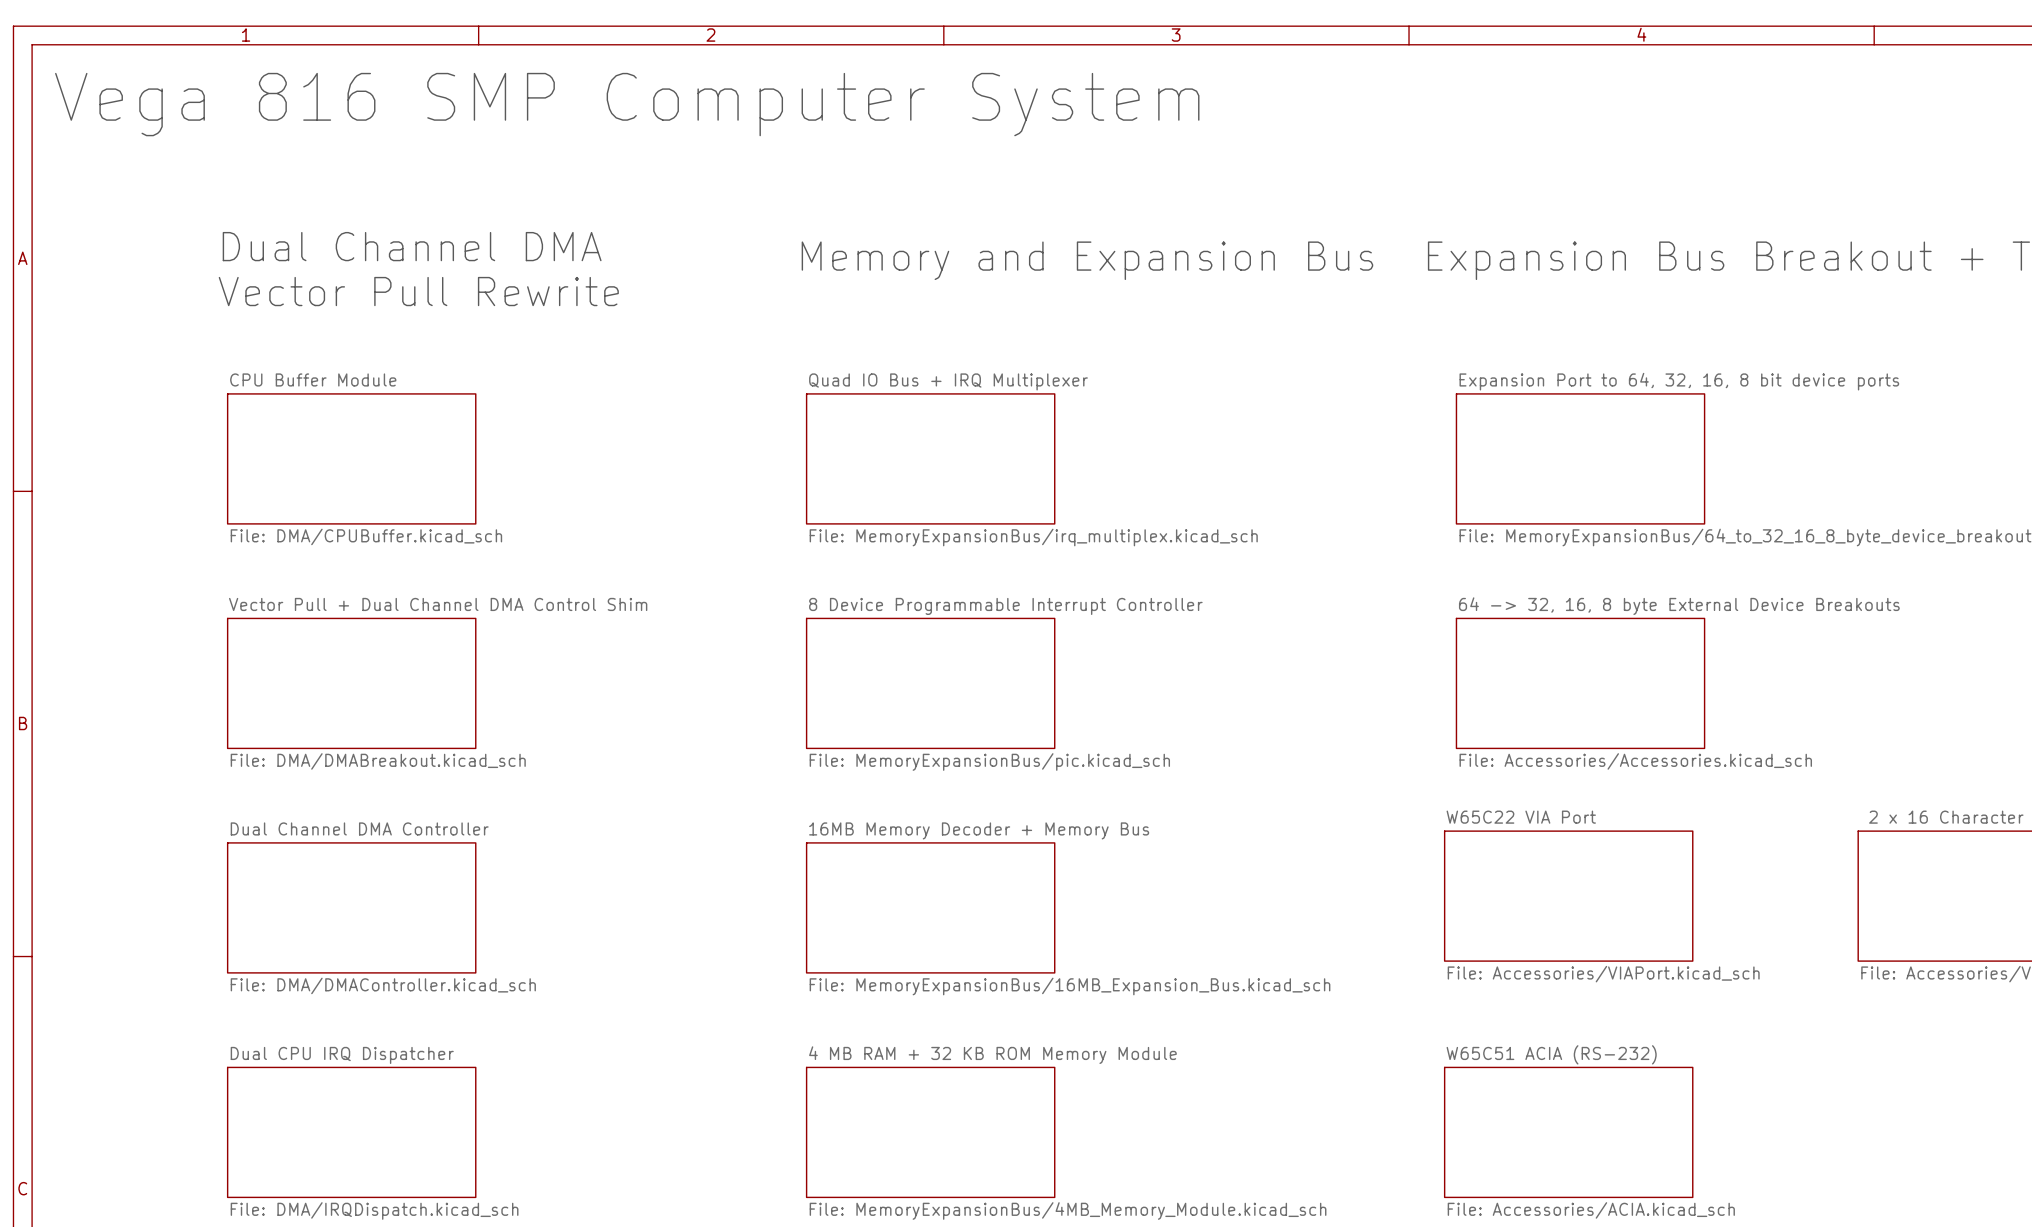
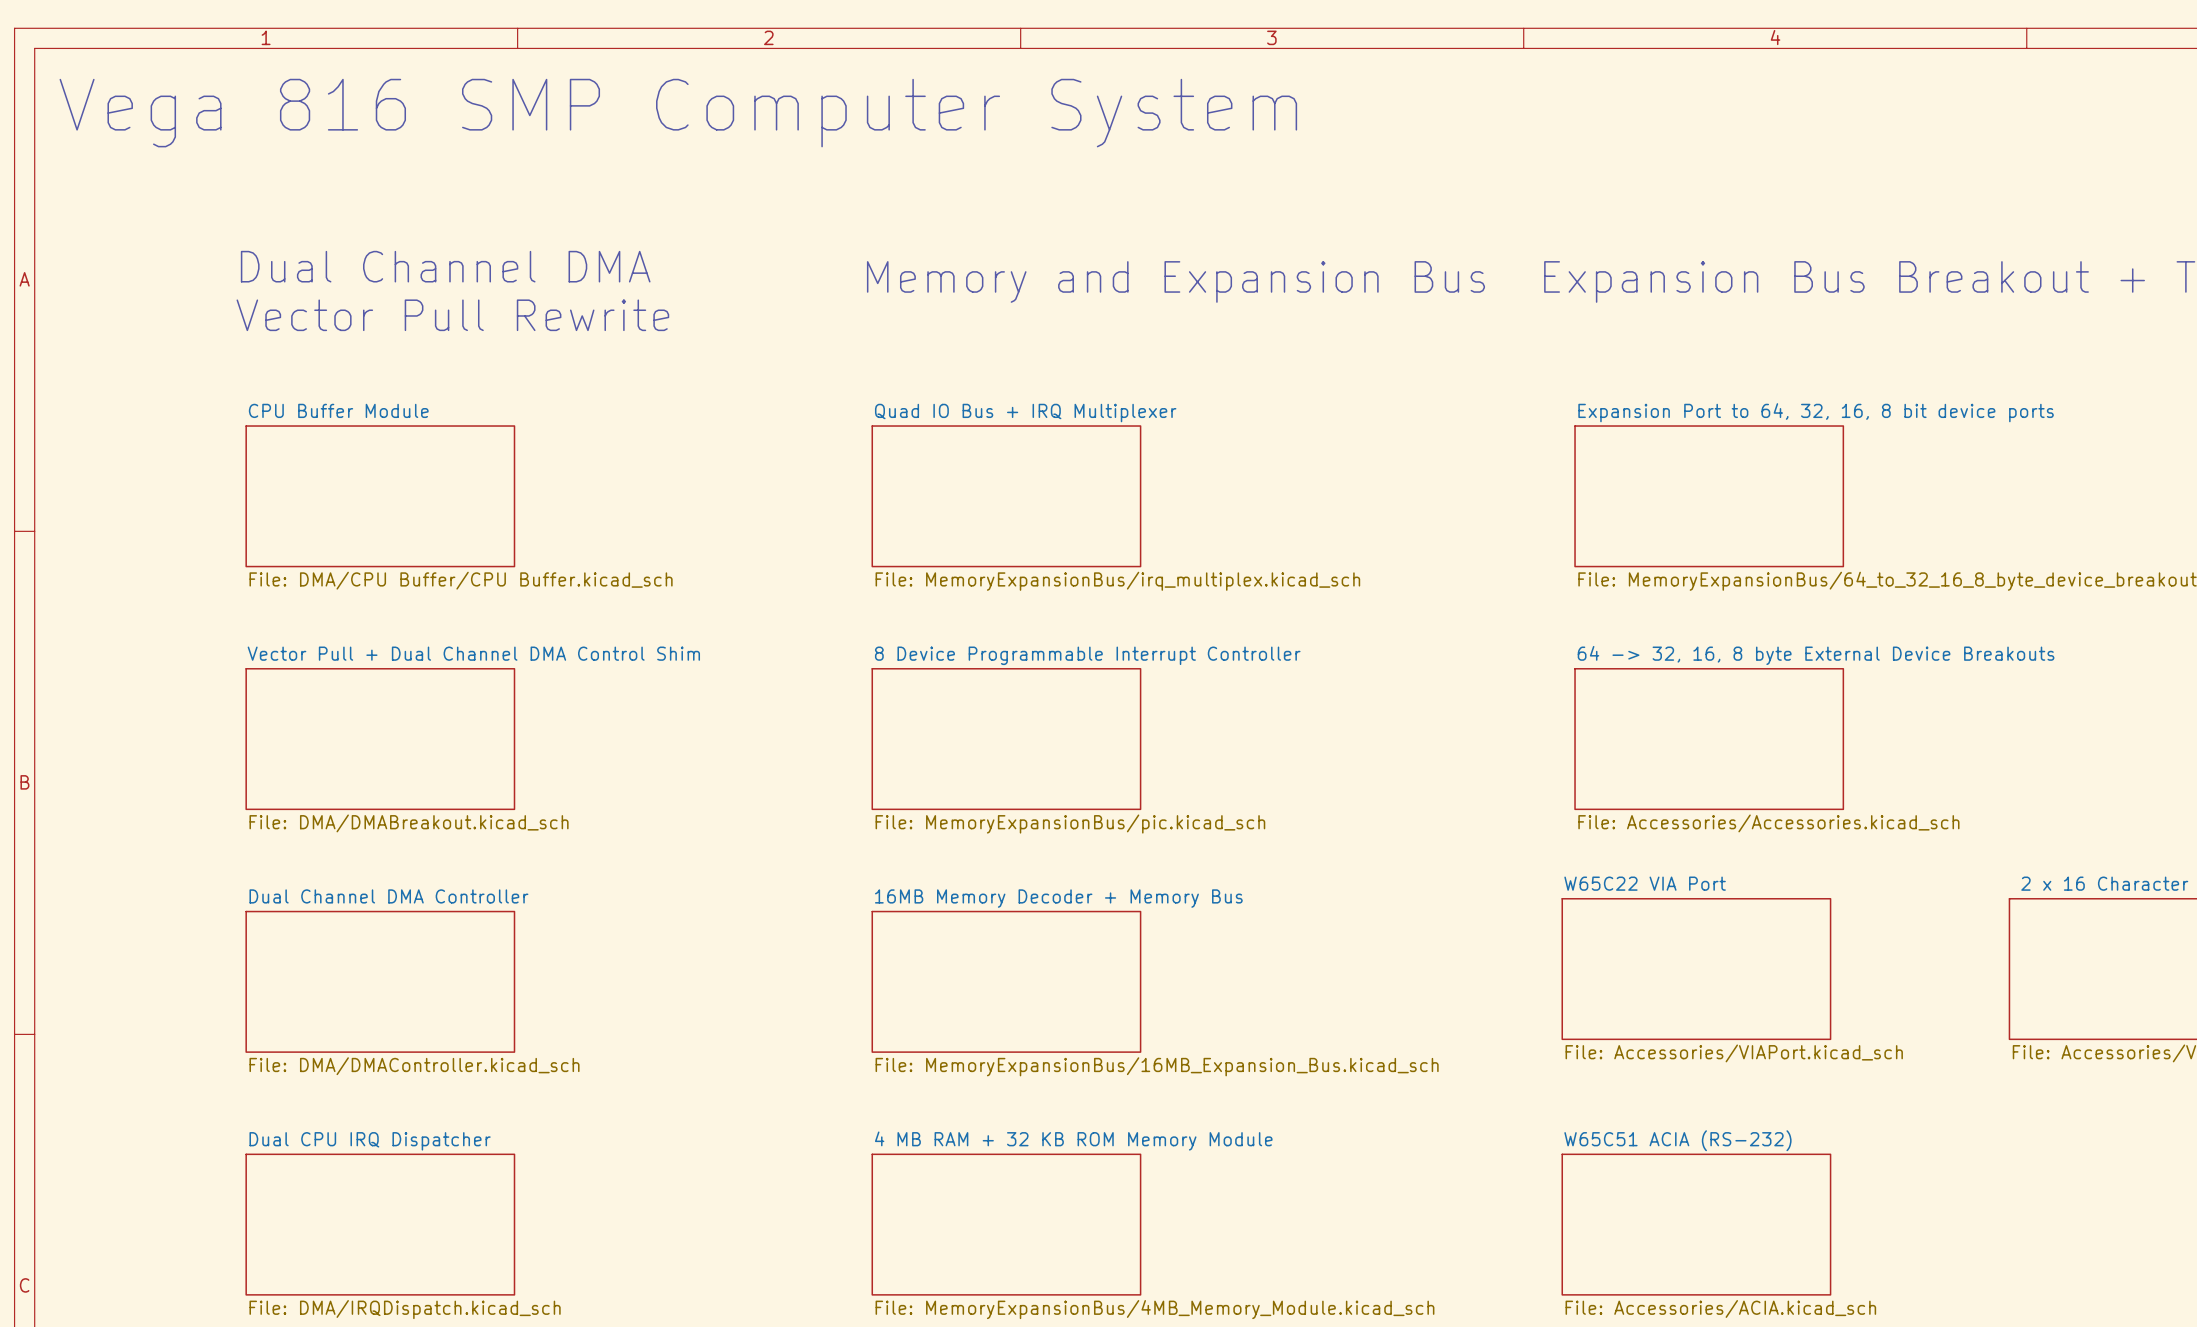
sheet CPU Buffer Module value: File: DMA/CPUBuffer.kicad_sch (366, 536) -> File: DMA/CPU Buffer/CPU Buffer.kicad_sch (461, 580)

